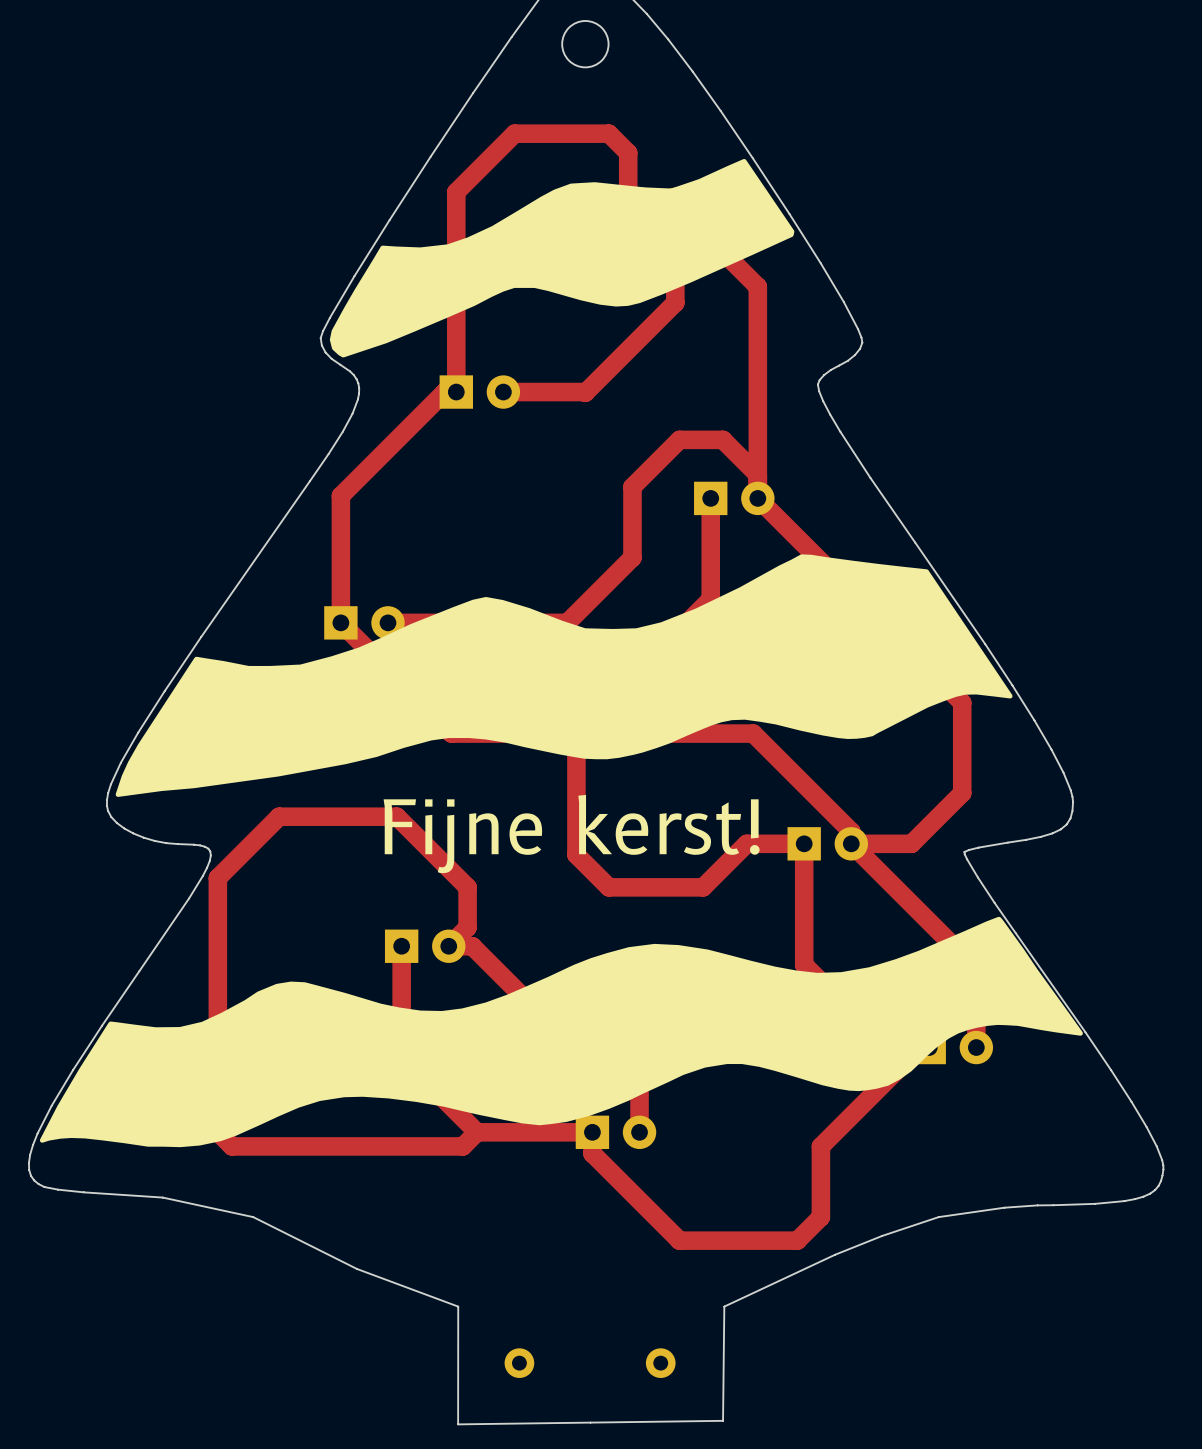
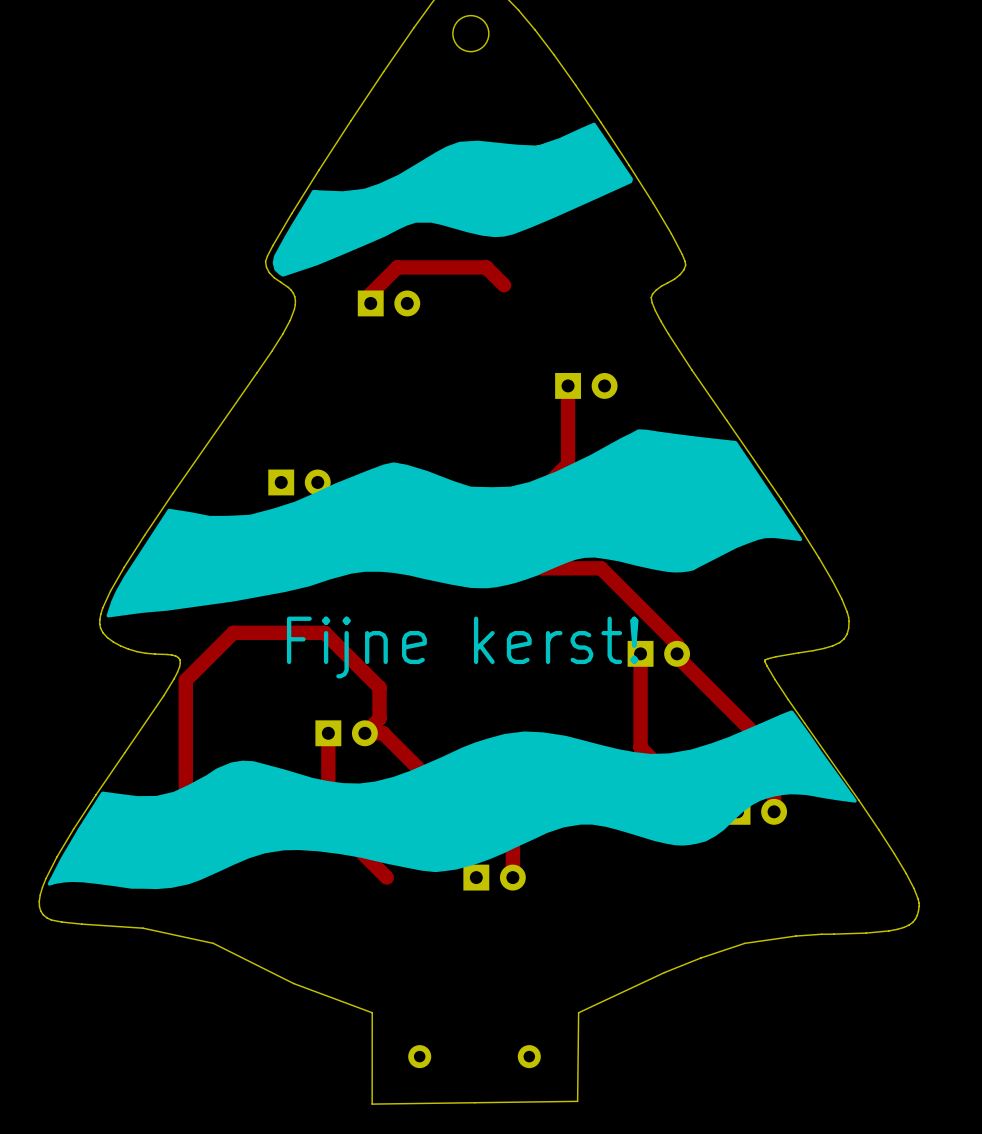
track: (628, 204) (628, 152) (608, 133) (514, 133) (456, 192) (456, 379) -> (504, 285) (486, 267) (397, 267) (370, 293)
track: (456, 392) (444, 392) (340, 495) (340, 622) (451, 733) (576, 733) (576, 854) (608, 887) (703, 887) (746, 843) (804, 843) -> none
track: (503, 392) (585, 392) (675, 302) (675, 204) (757, 286) (757, 498) (962, 702) (962, 793) (911, 843) (851, 843) (976, 968) (976, 972) -> (677, 653) (677, 656) (774, 753)
track: (757, 474) (722, 439) (679, 439) (632, 486) (632, 557) (567, 622) (387, 622) -> none
track: (919, 1047) (820, 1146) (820, 1217) (797, 1240) (679, 1240) (592, 1153) (592, 1132) (477, 1132) (462, 1146) (232, 1146) (170, 1085) -> none

